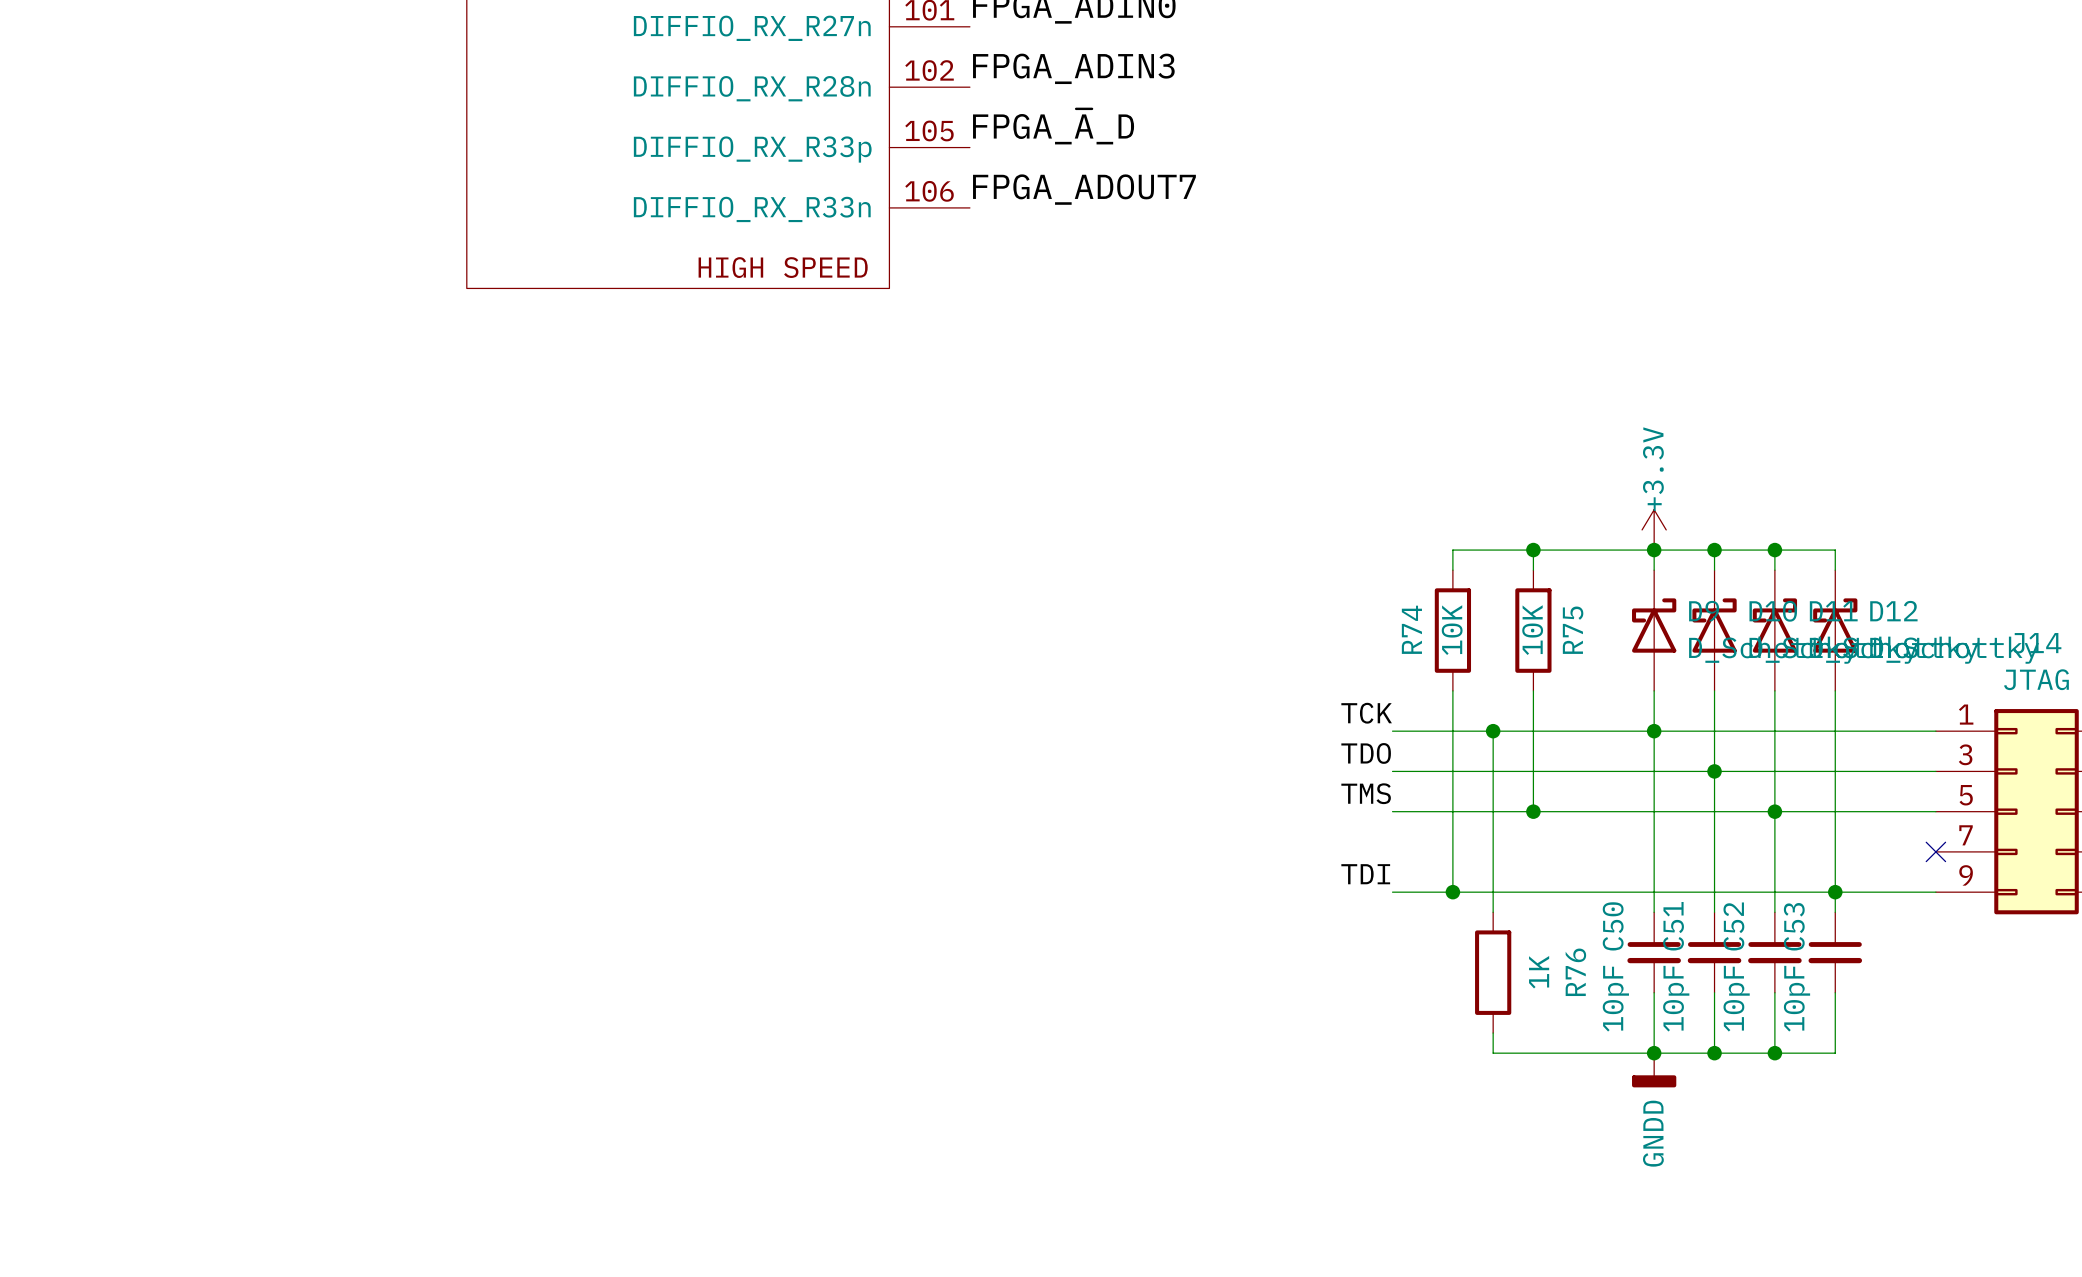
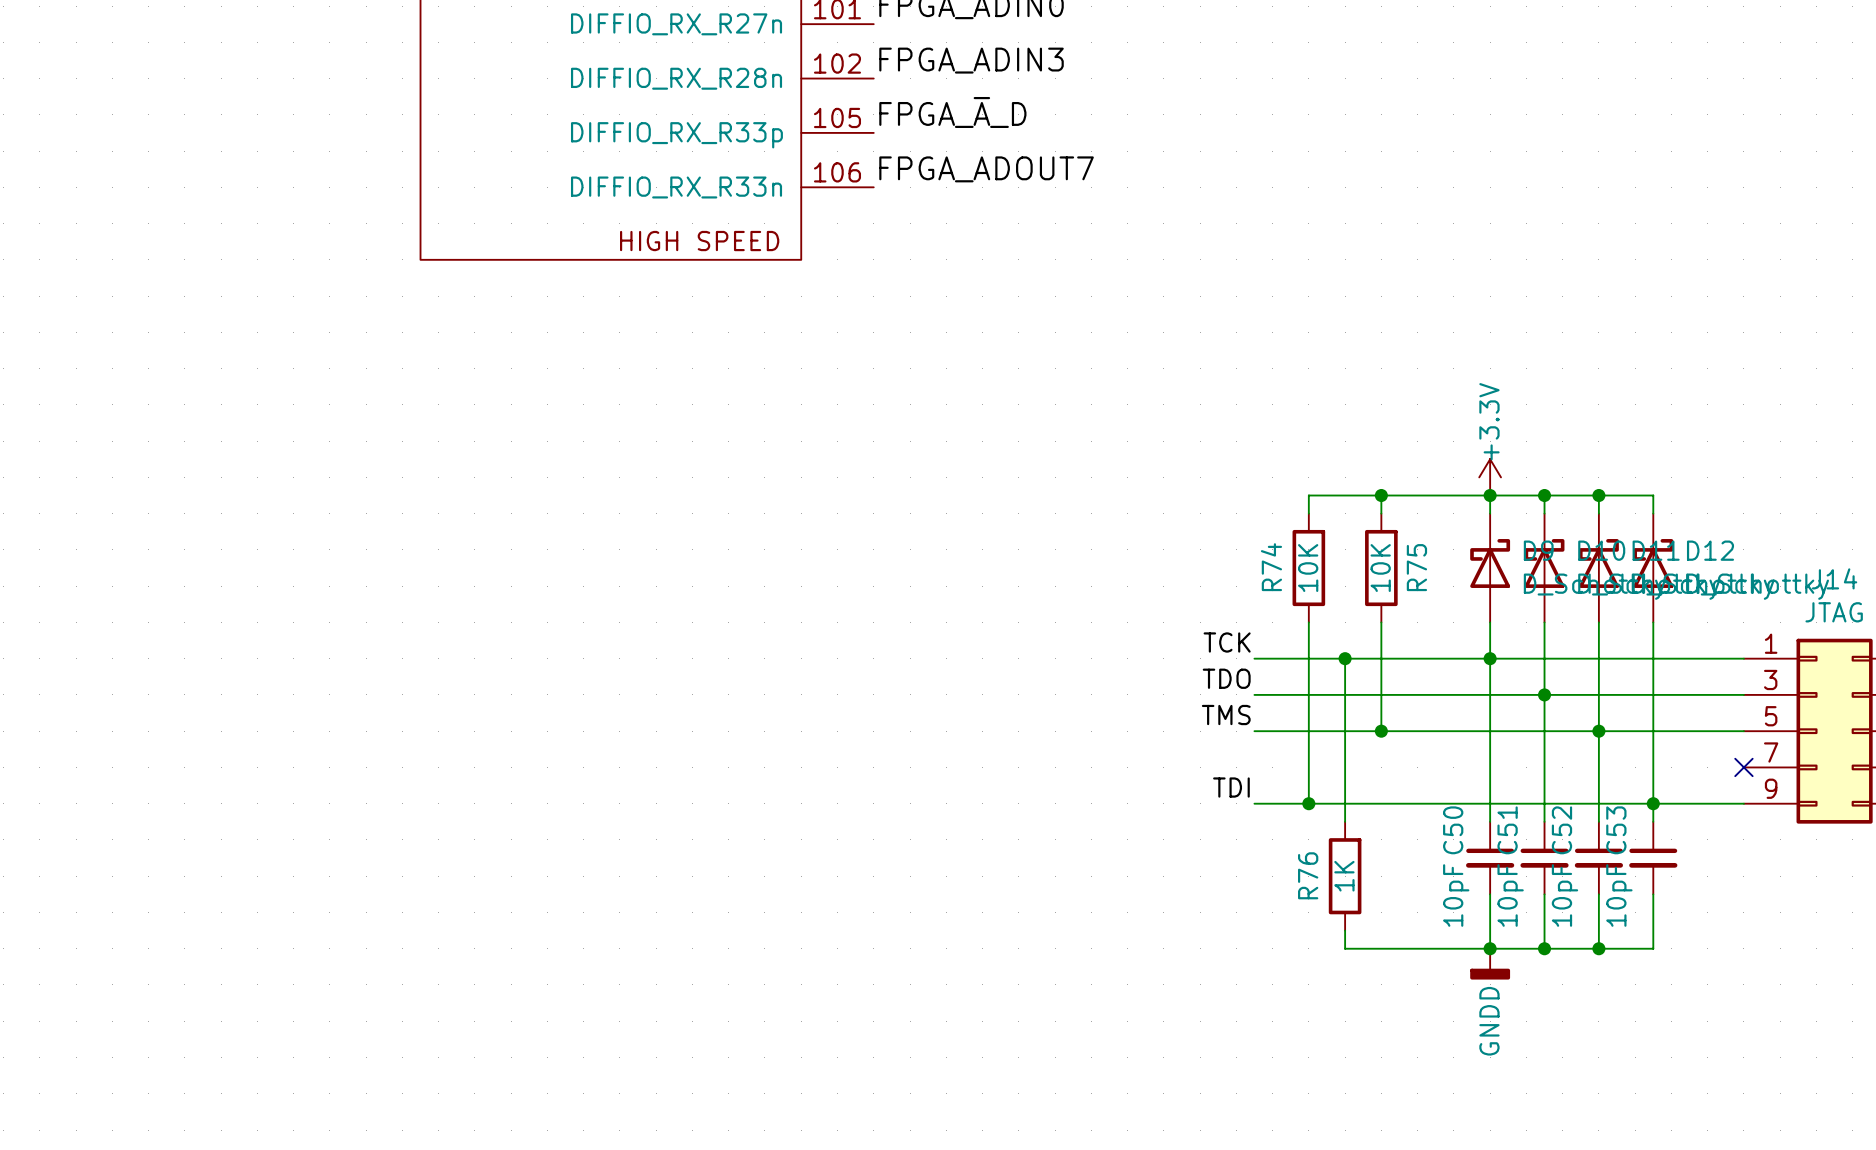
R76 value position: 1K (1539, 972) -> 1K (1344, 876)
R76 name position: R76 (1575, 972) -> R76 (1308, 875)

